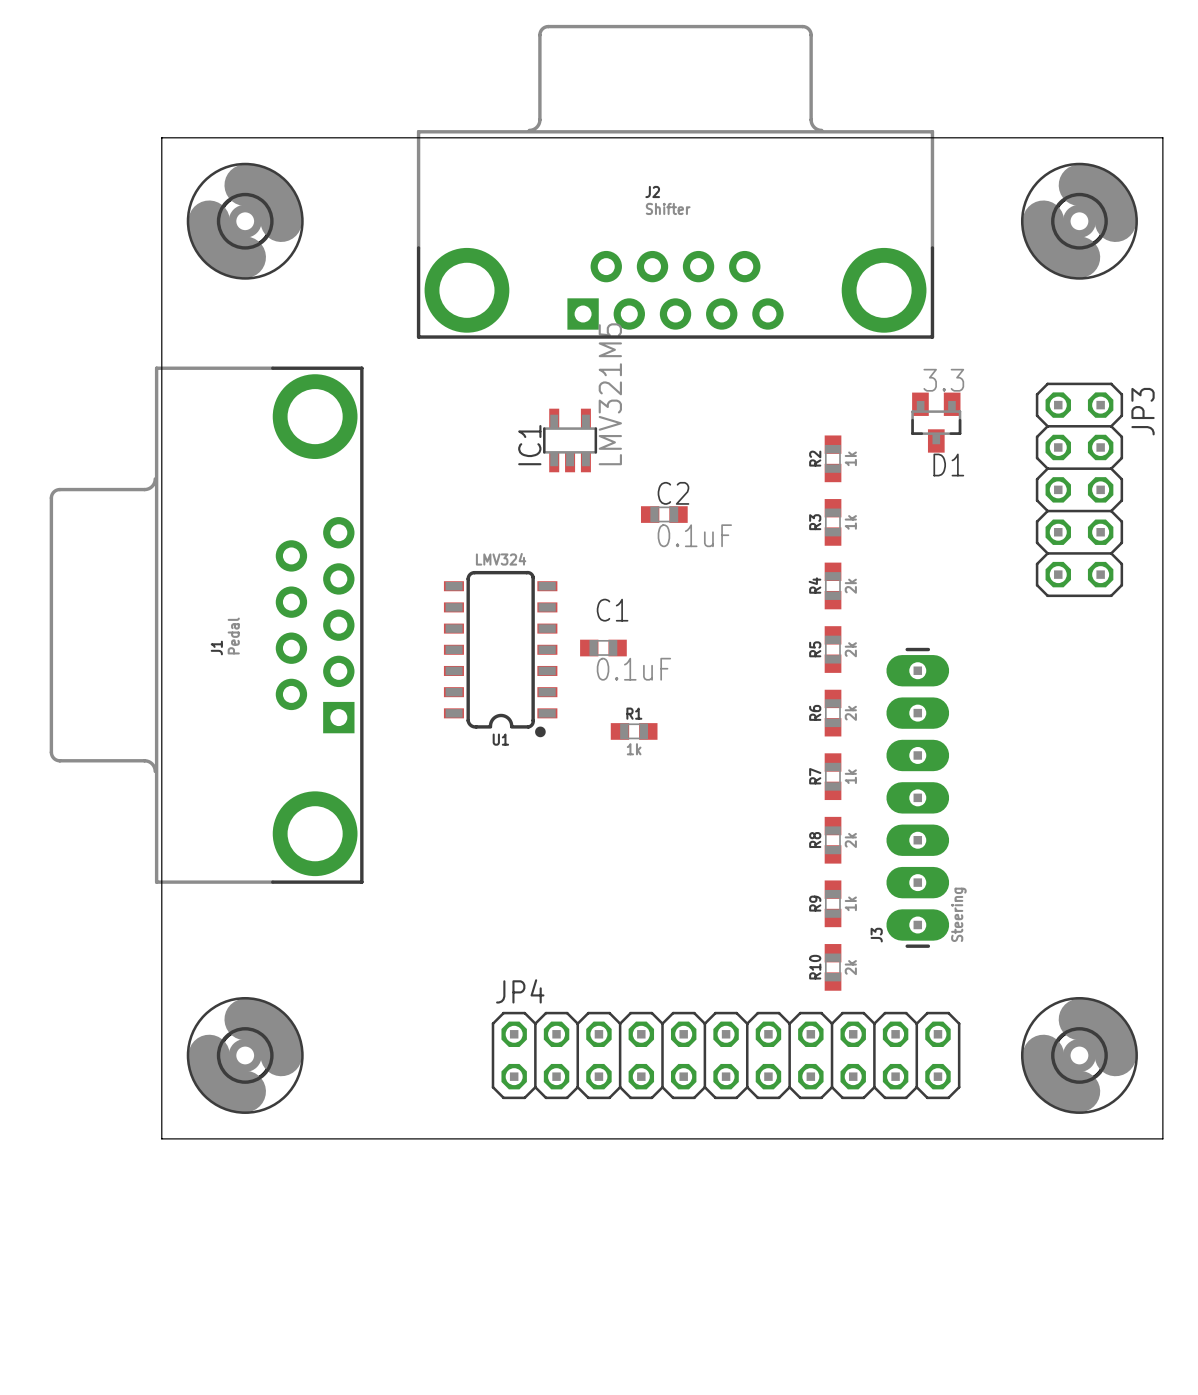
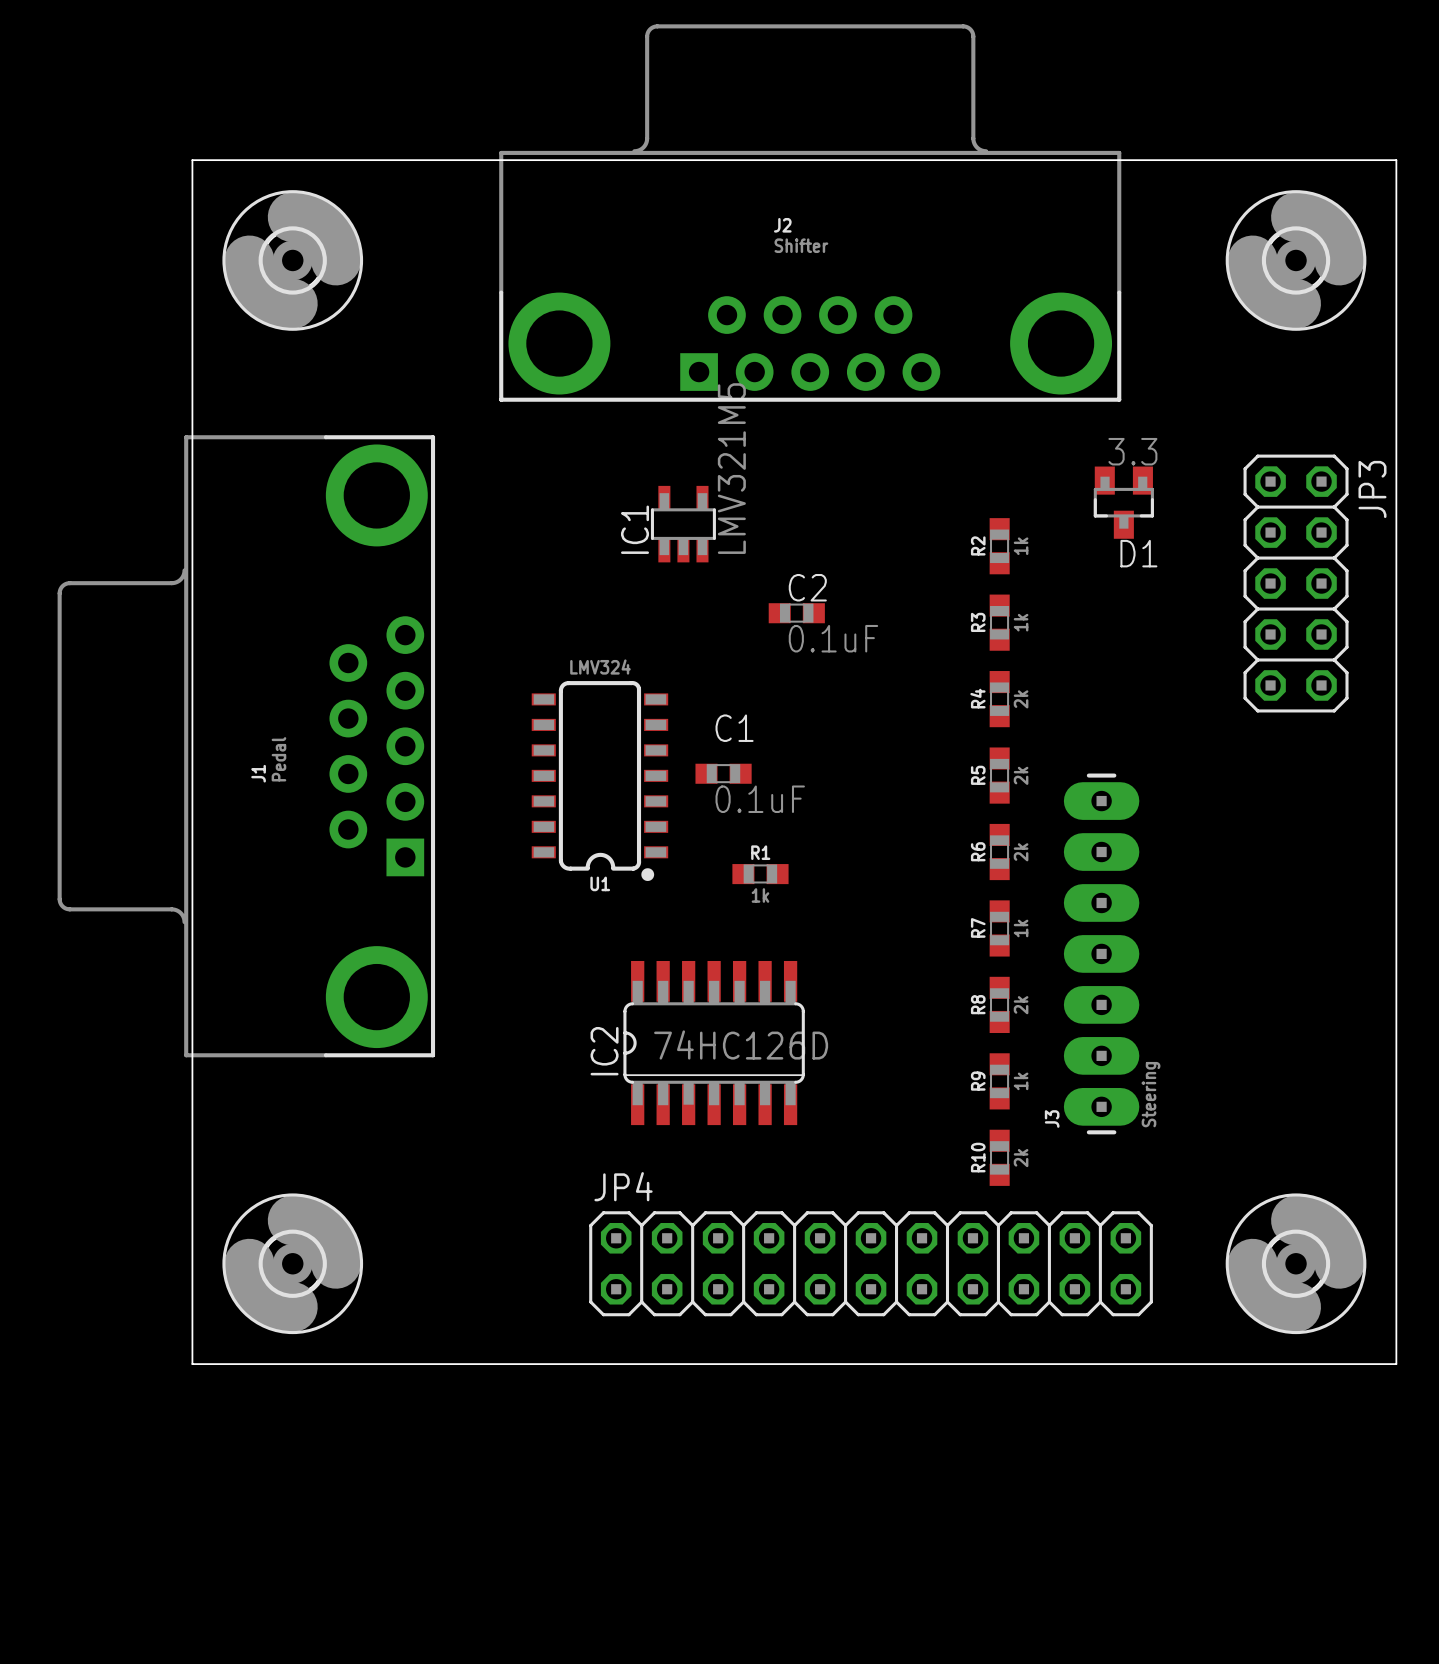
IC2: none -> 74HC126D (714, 1043)

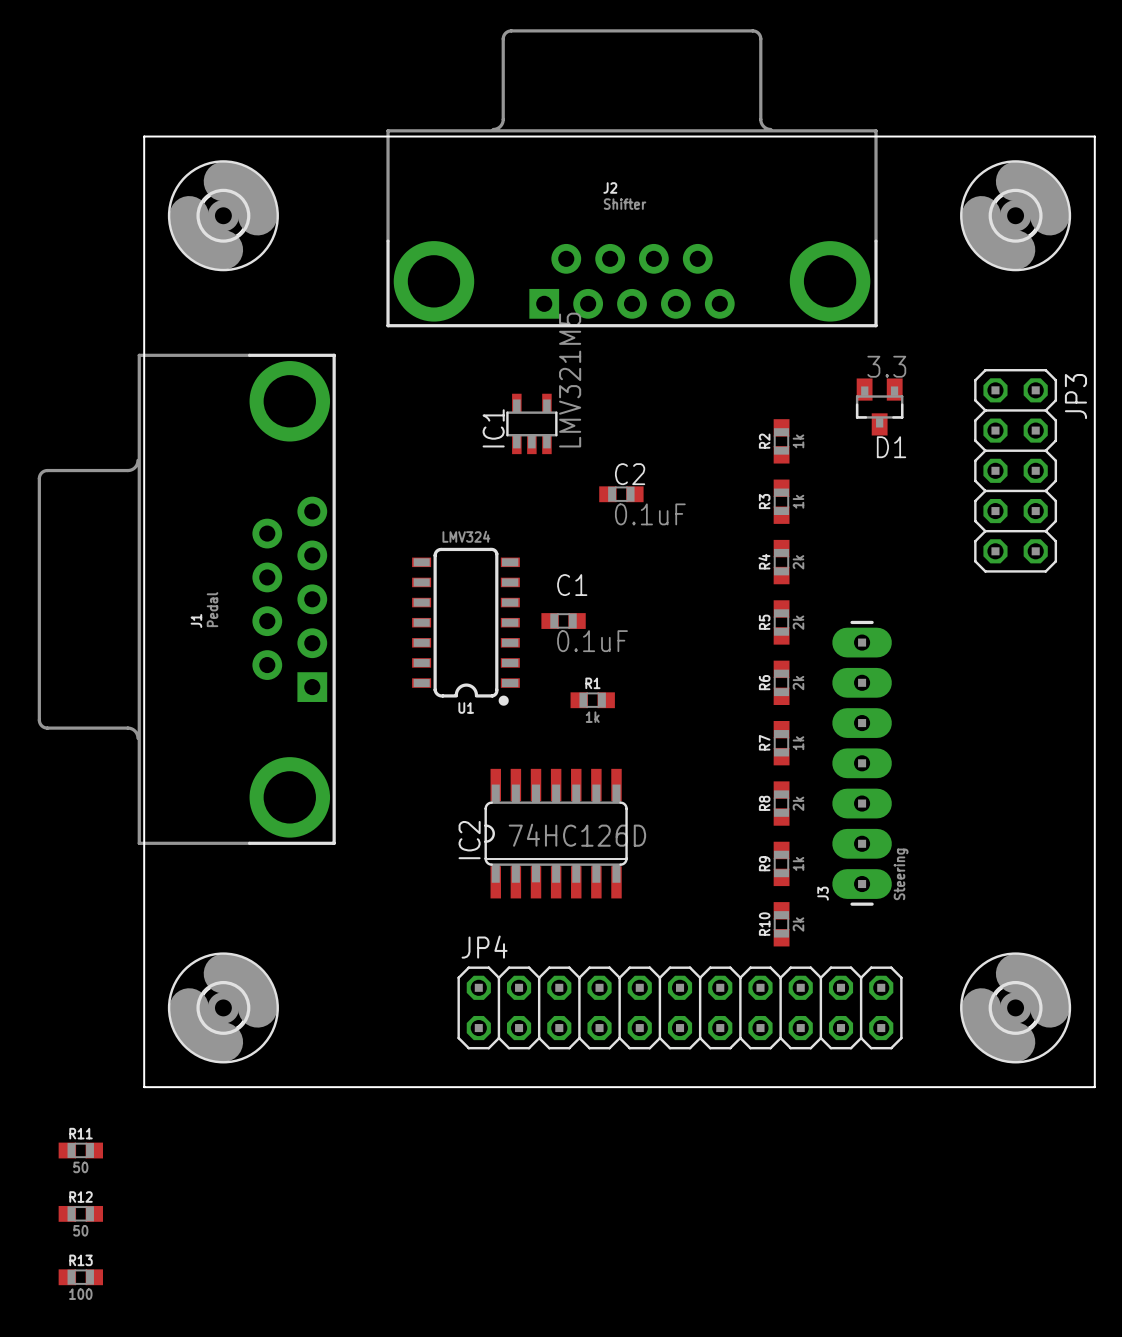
R11: none -> 50 (80, 1150)
R12: none -> 50 (80, 1213)
R13: none -> 100 (80, 1277)

